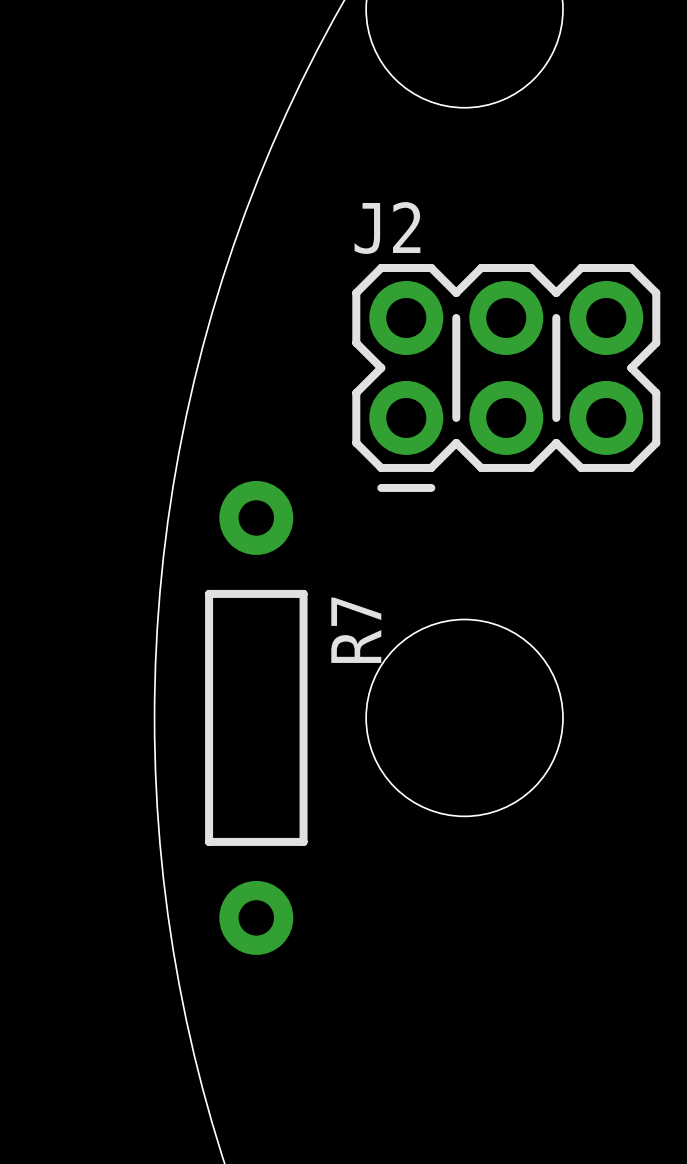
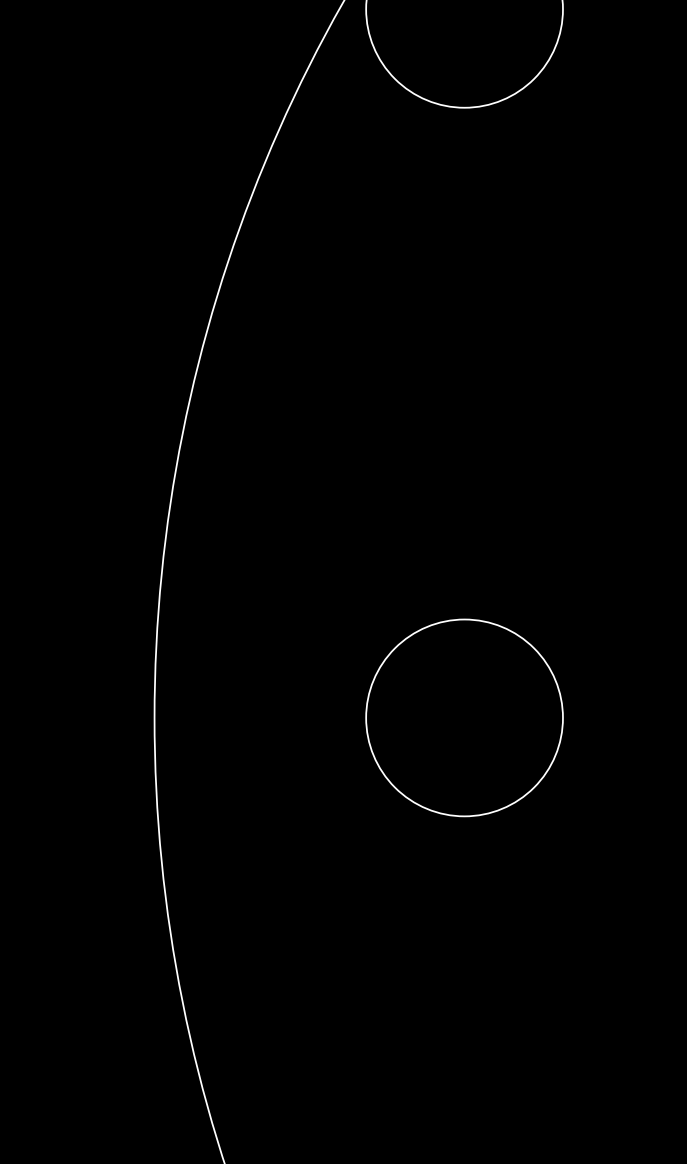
J2: (506, 377) -> none
R7: (256, 717) -> none

